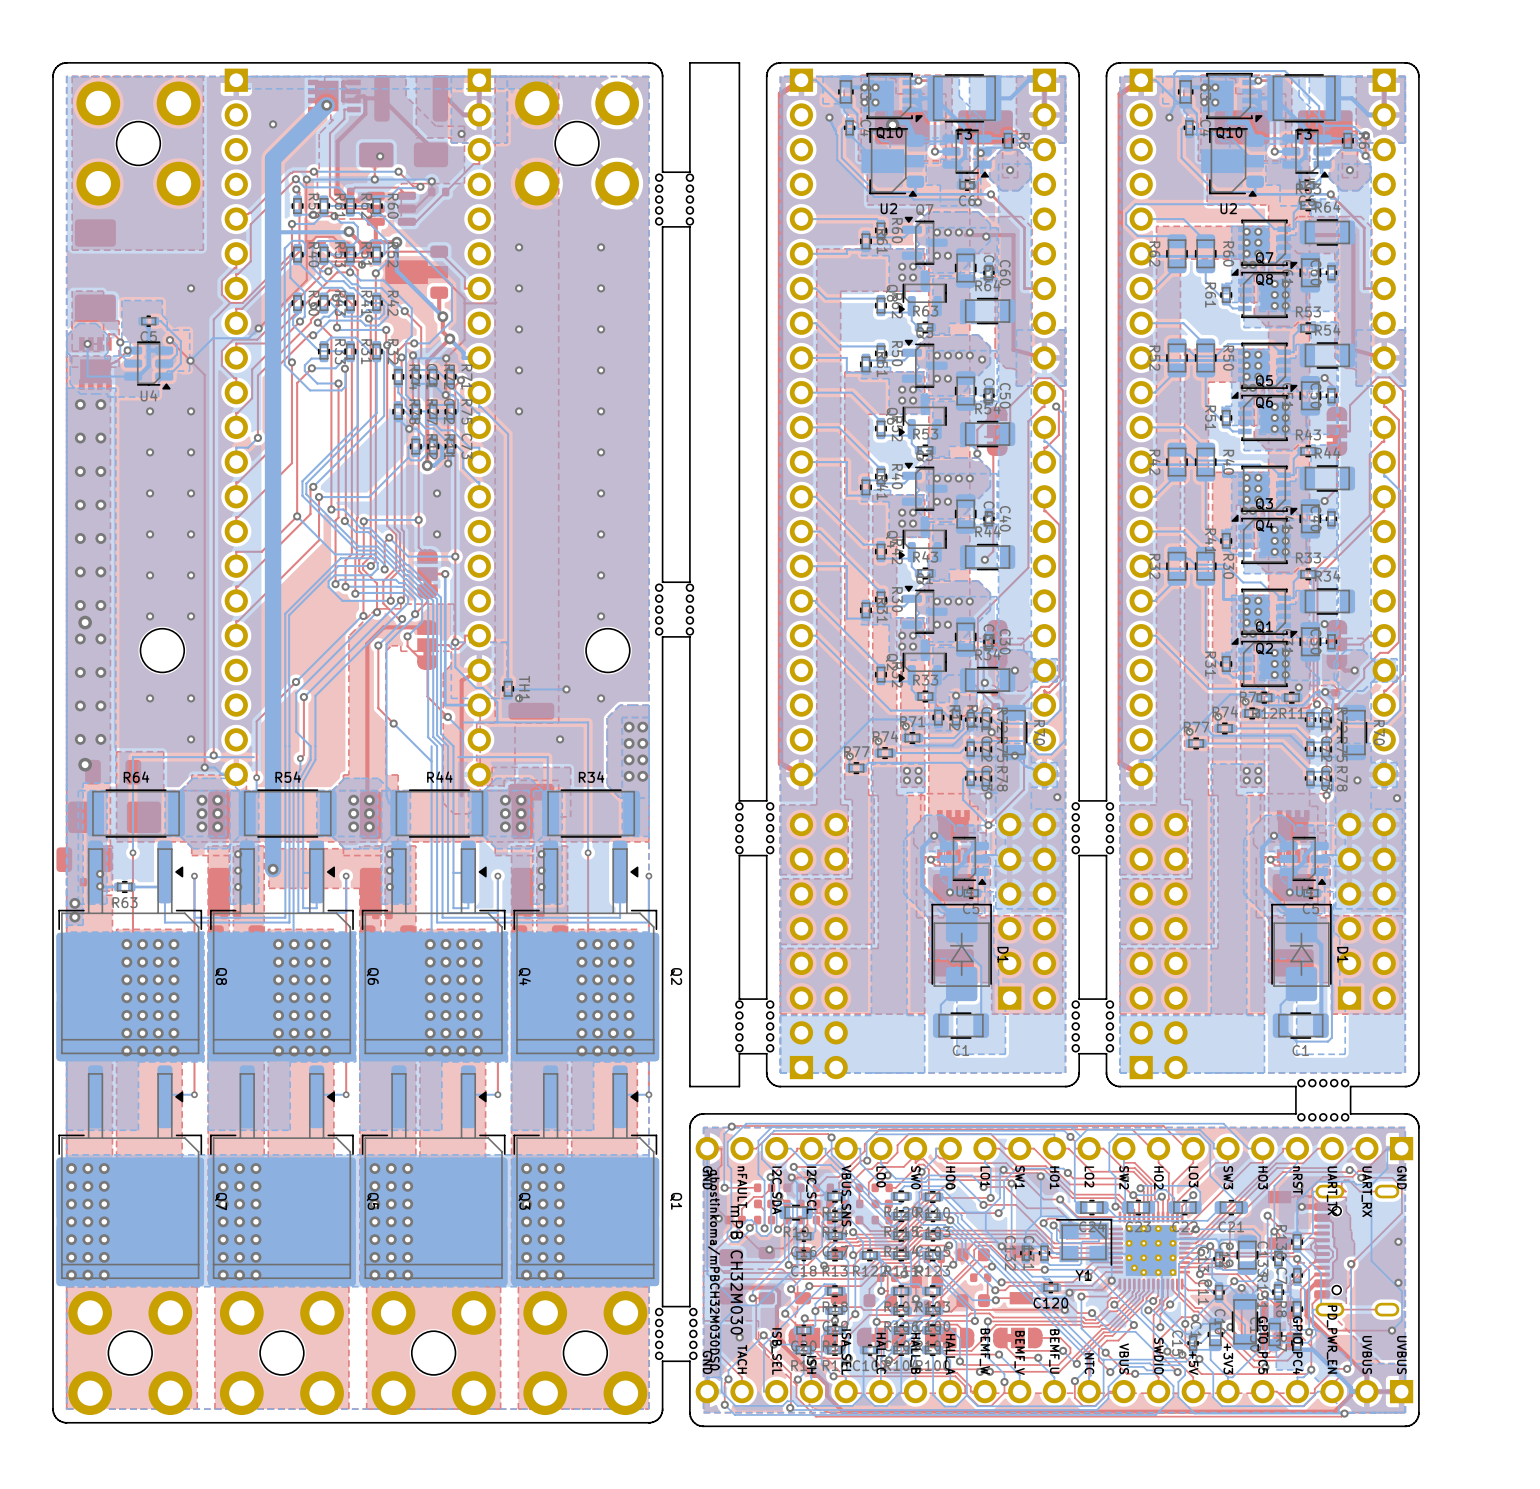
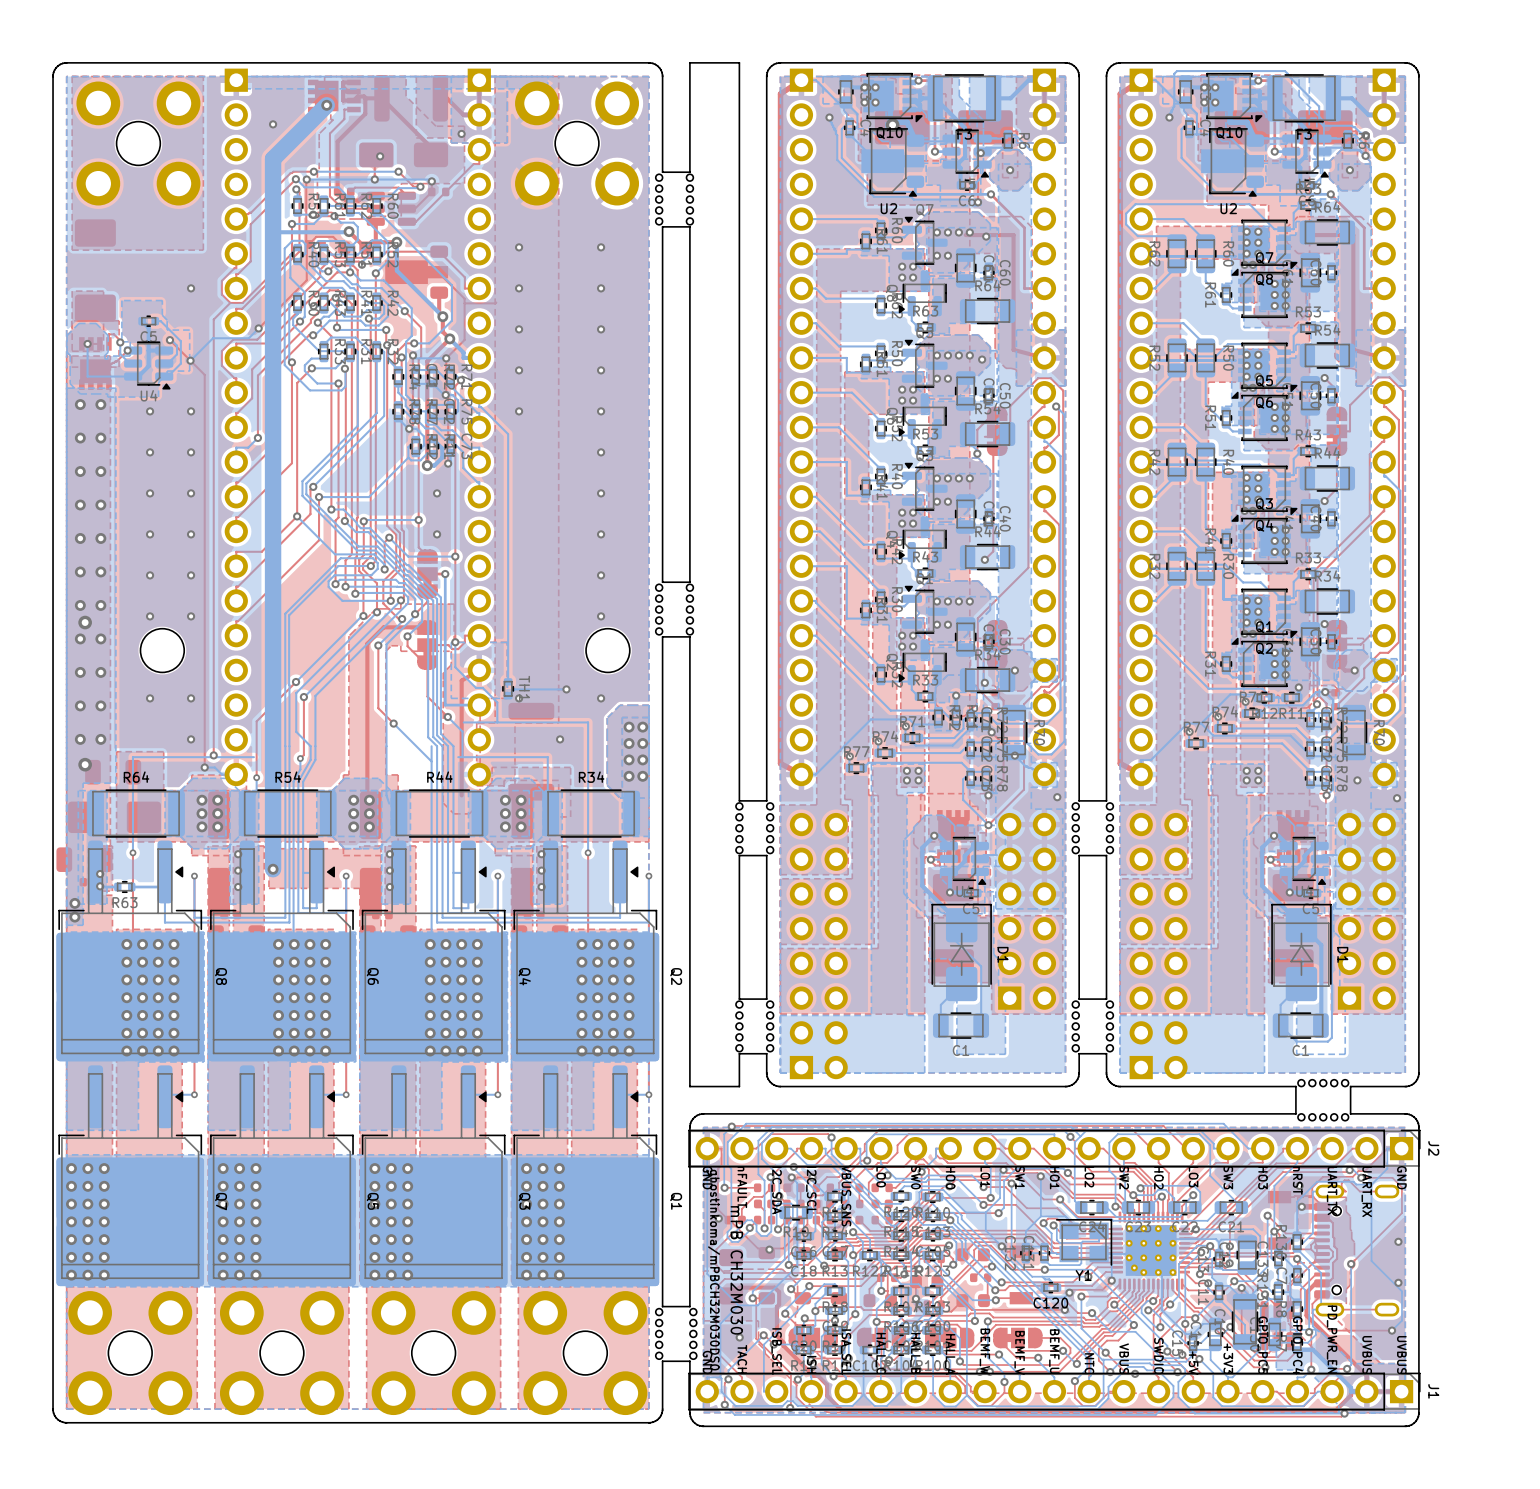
J2 side: top (1054, 1148) -> bottom (1054, 1148)
J1 side: top (1054, 1391) -> bottom (1054, 1391)

